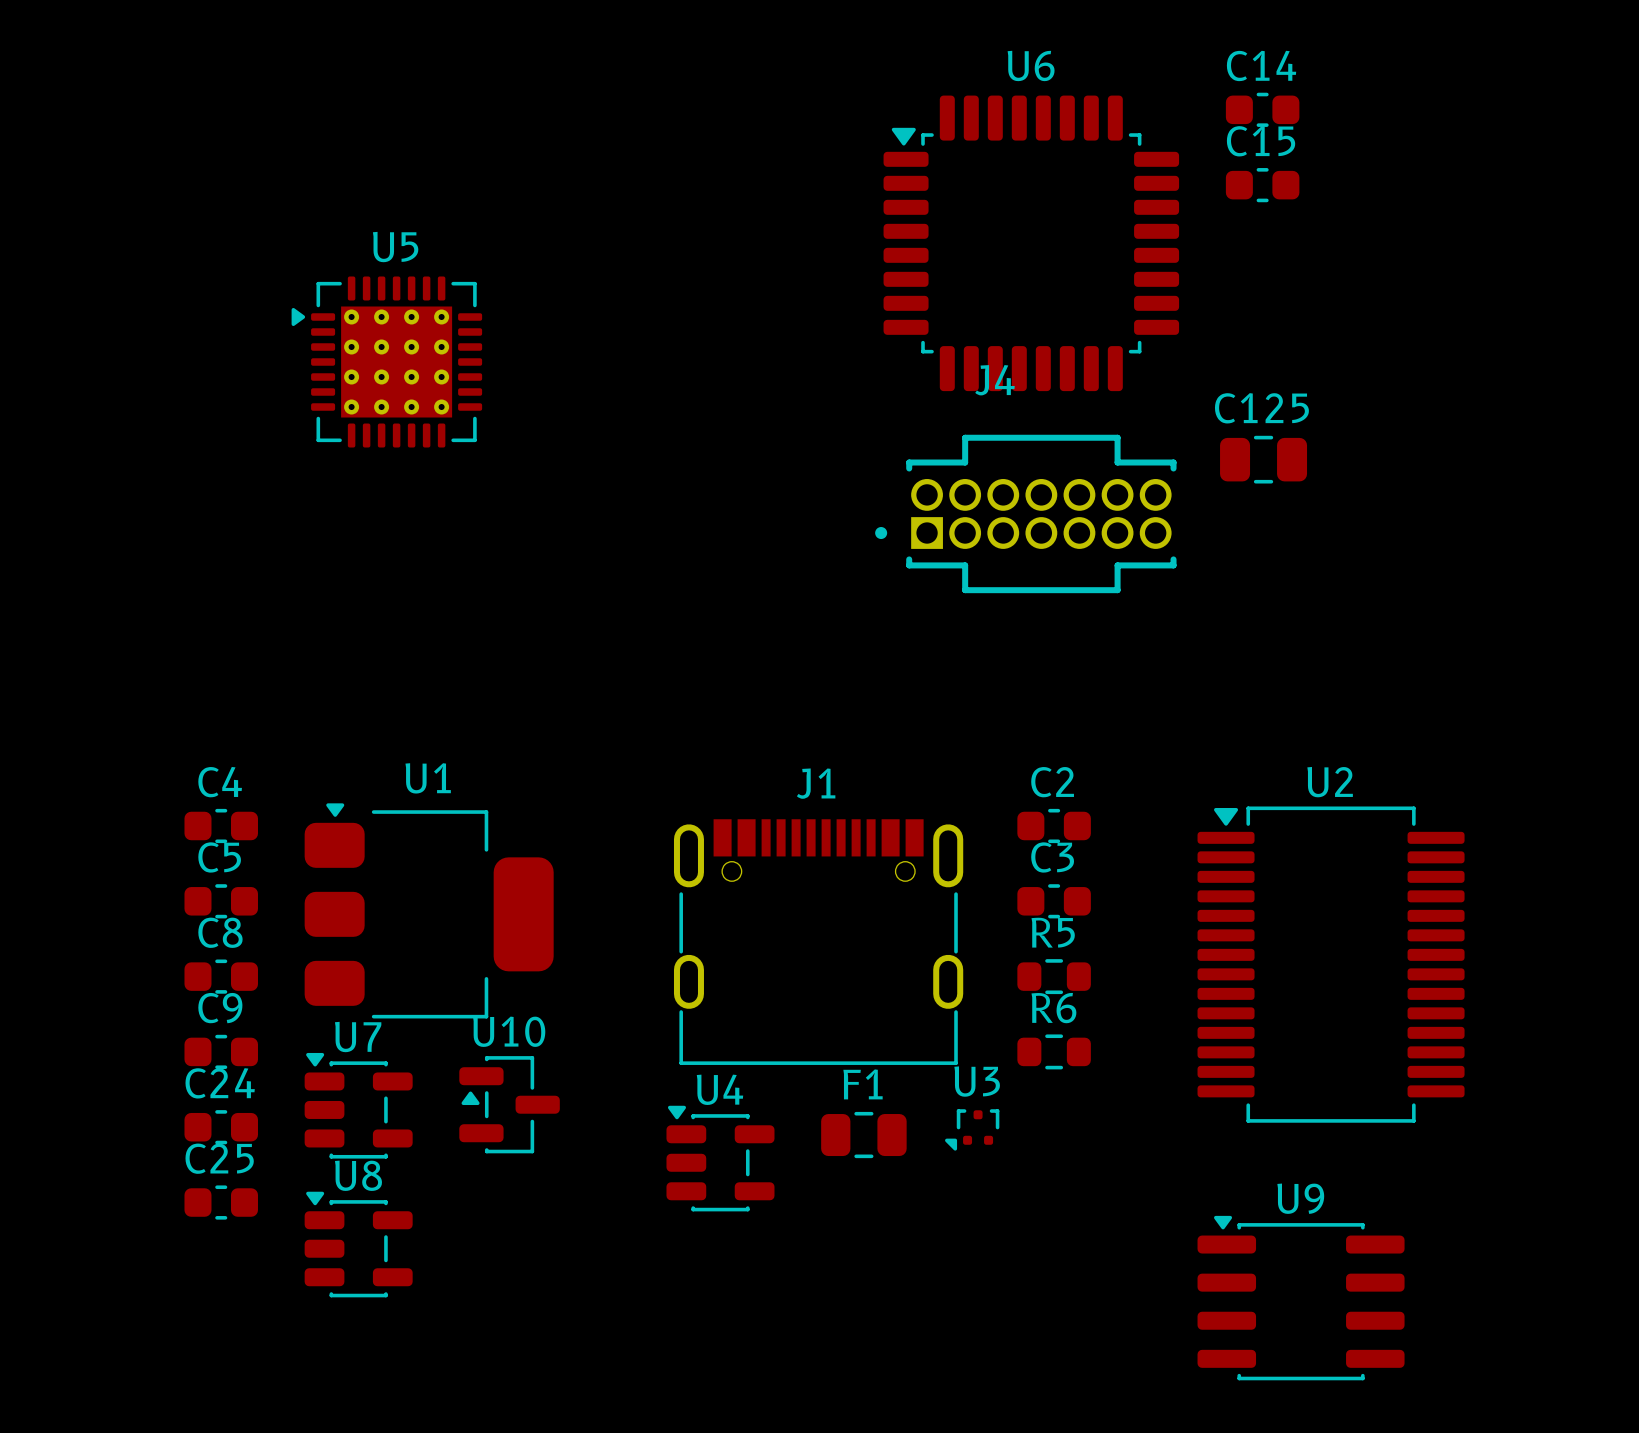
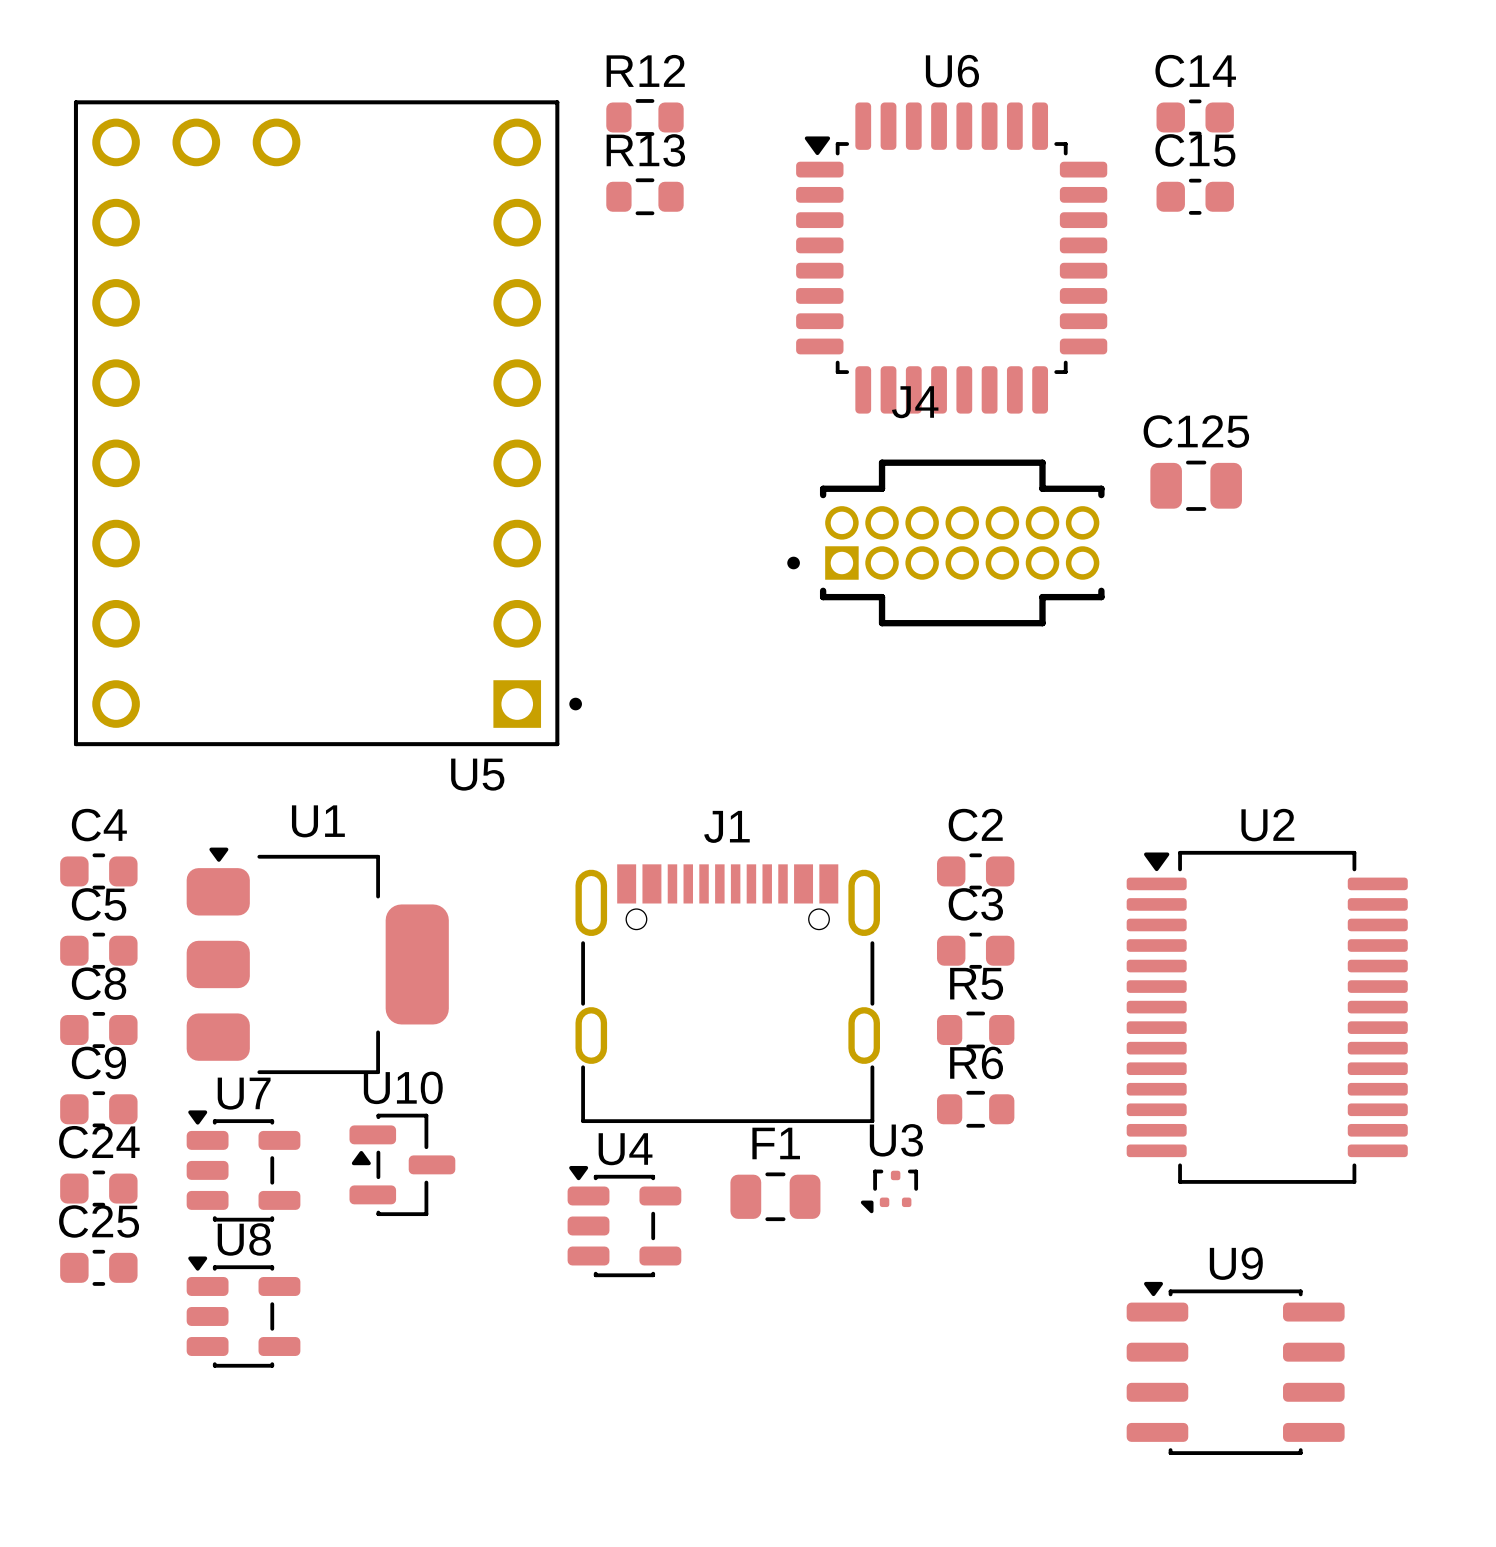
R12: none -> (644, 117)
R13: none -> (644, 196)
U5 name position: U5 (395, 247) -> U5 (477, 774)
U5 footprint: [291, 276, 483, 448] -> [73, 100, 582, 747]

